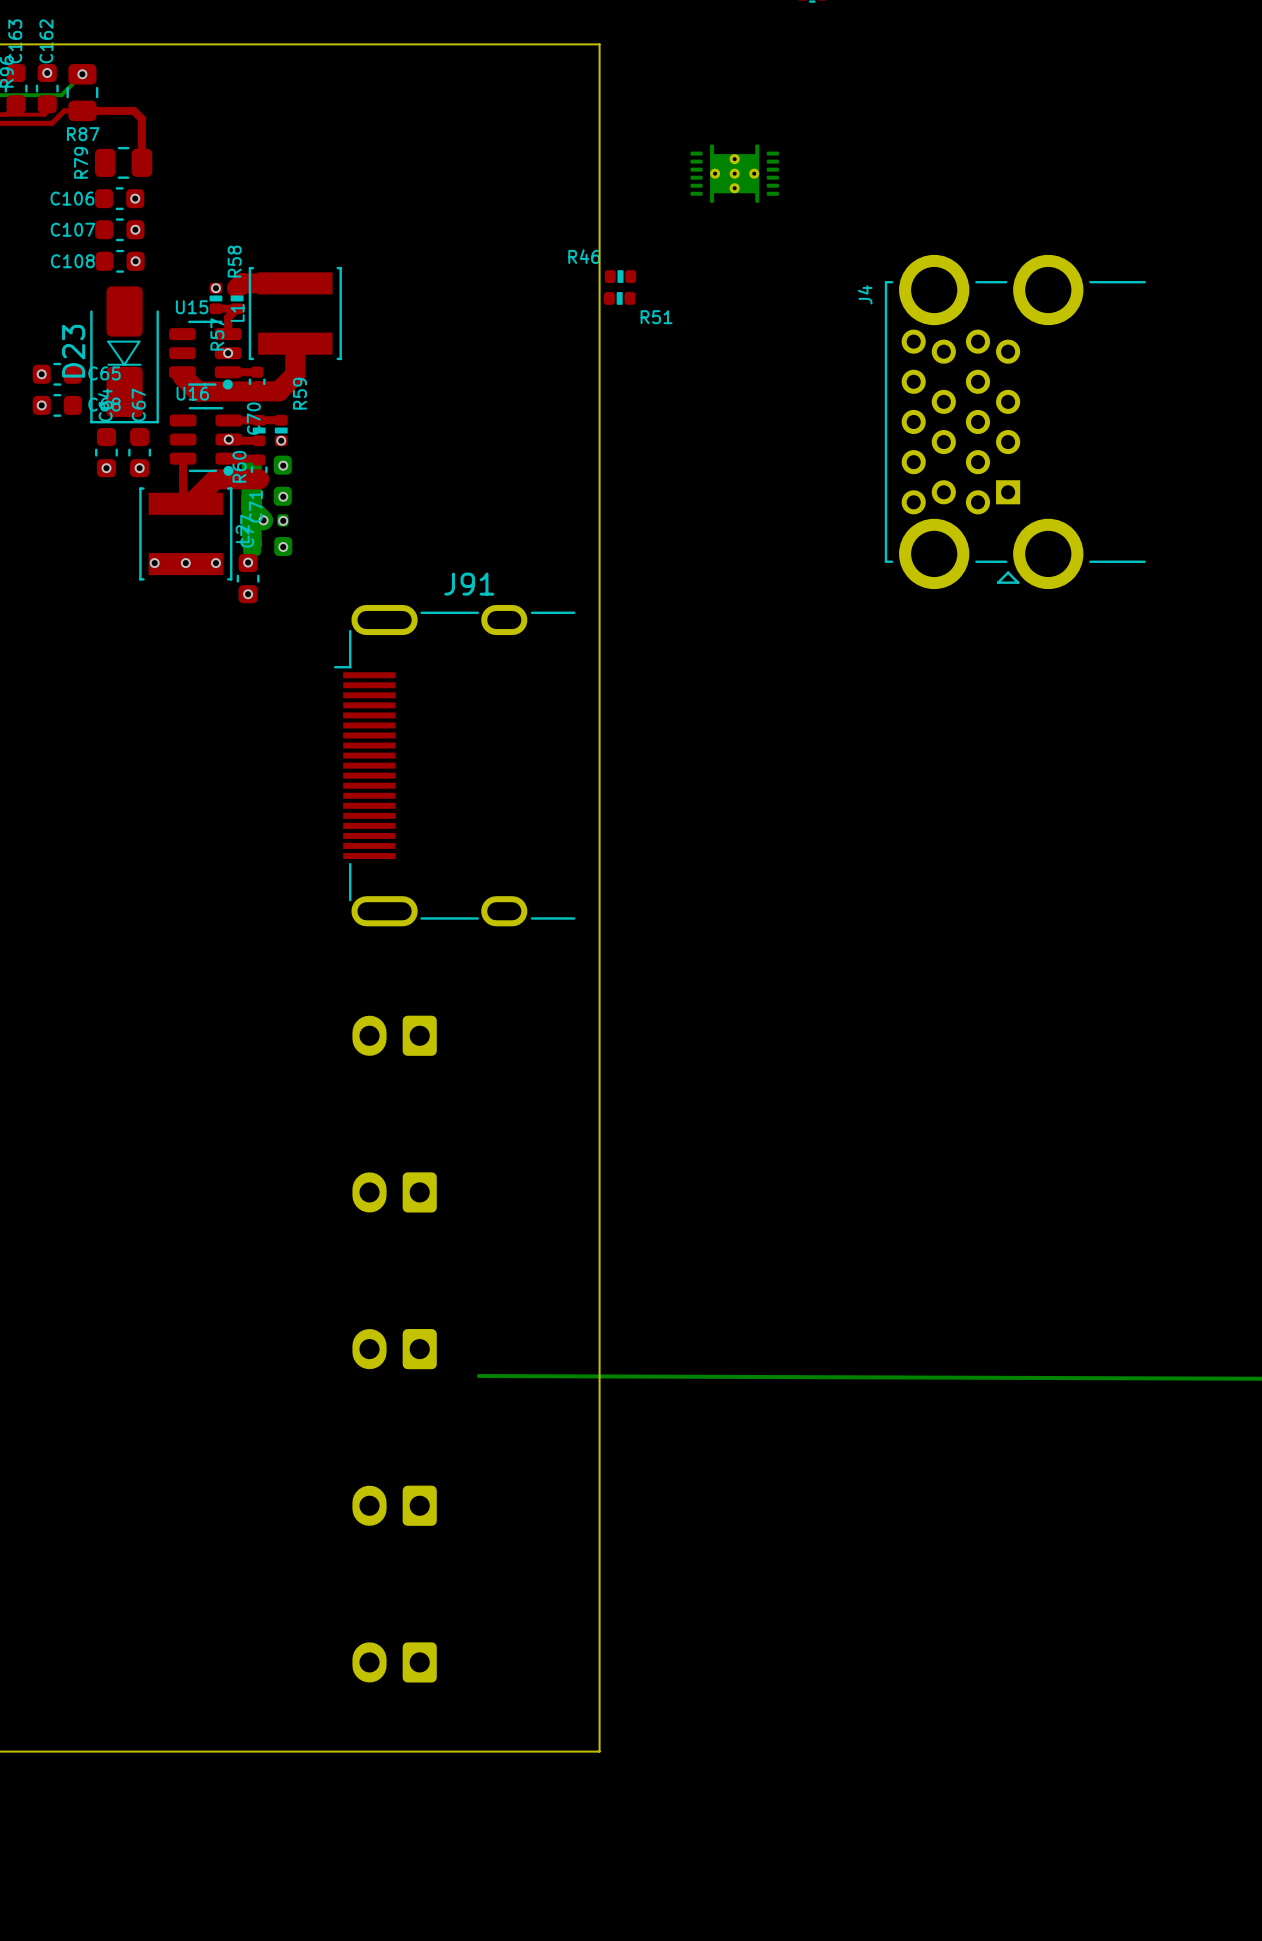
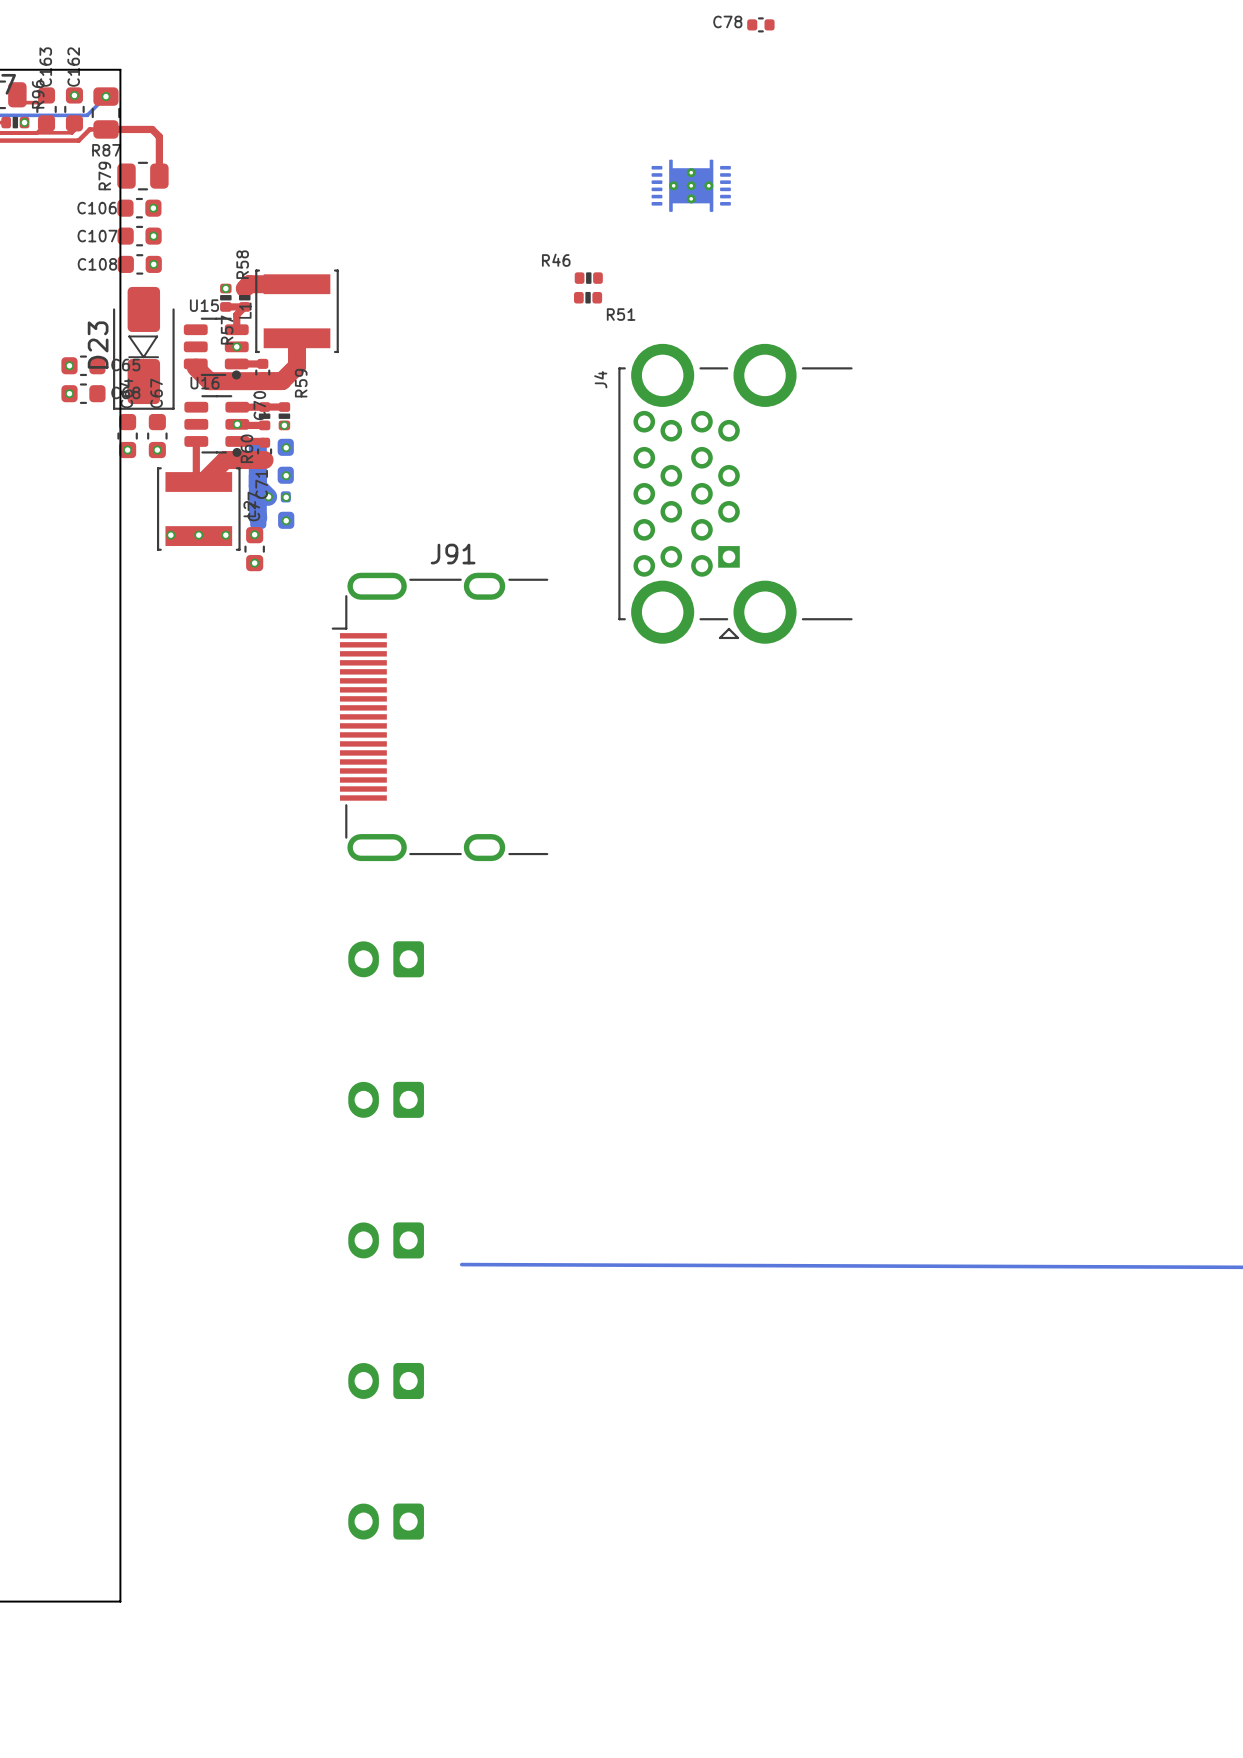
board edge: (98, 44) (599, 44) (599, 1751) (98, 1751) -> (120, 69) (120, 1601)
J4 position: (1015, 421) -> (735, 493)

